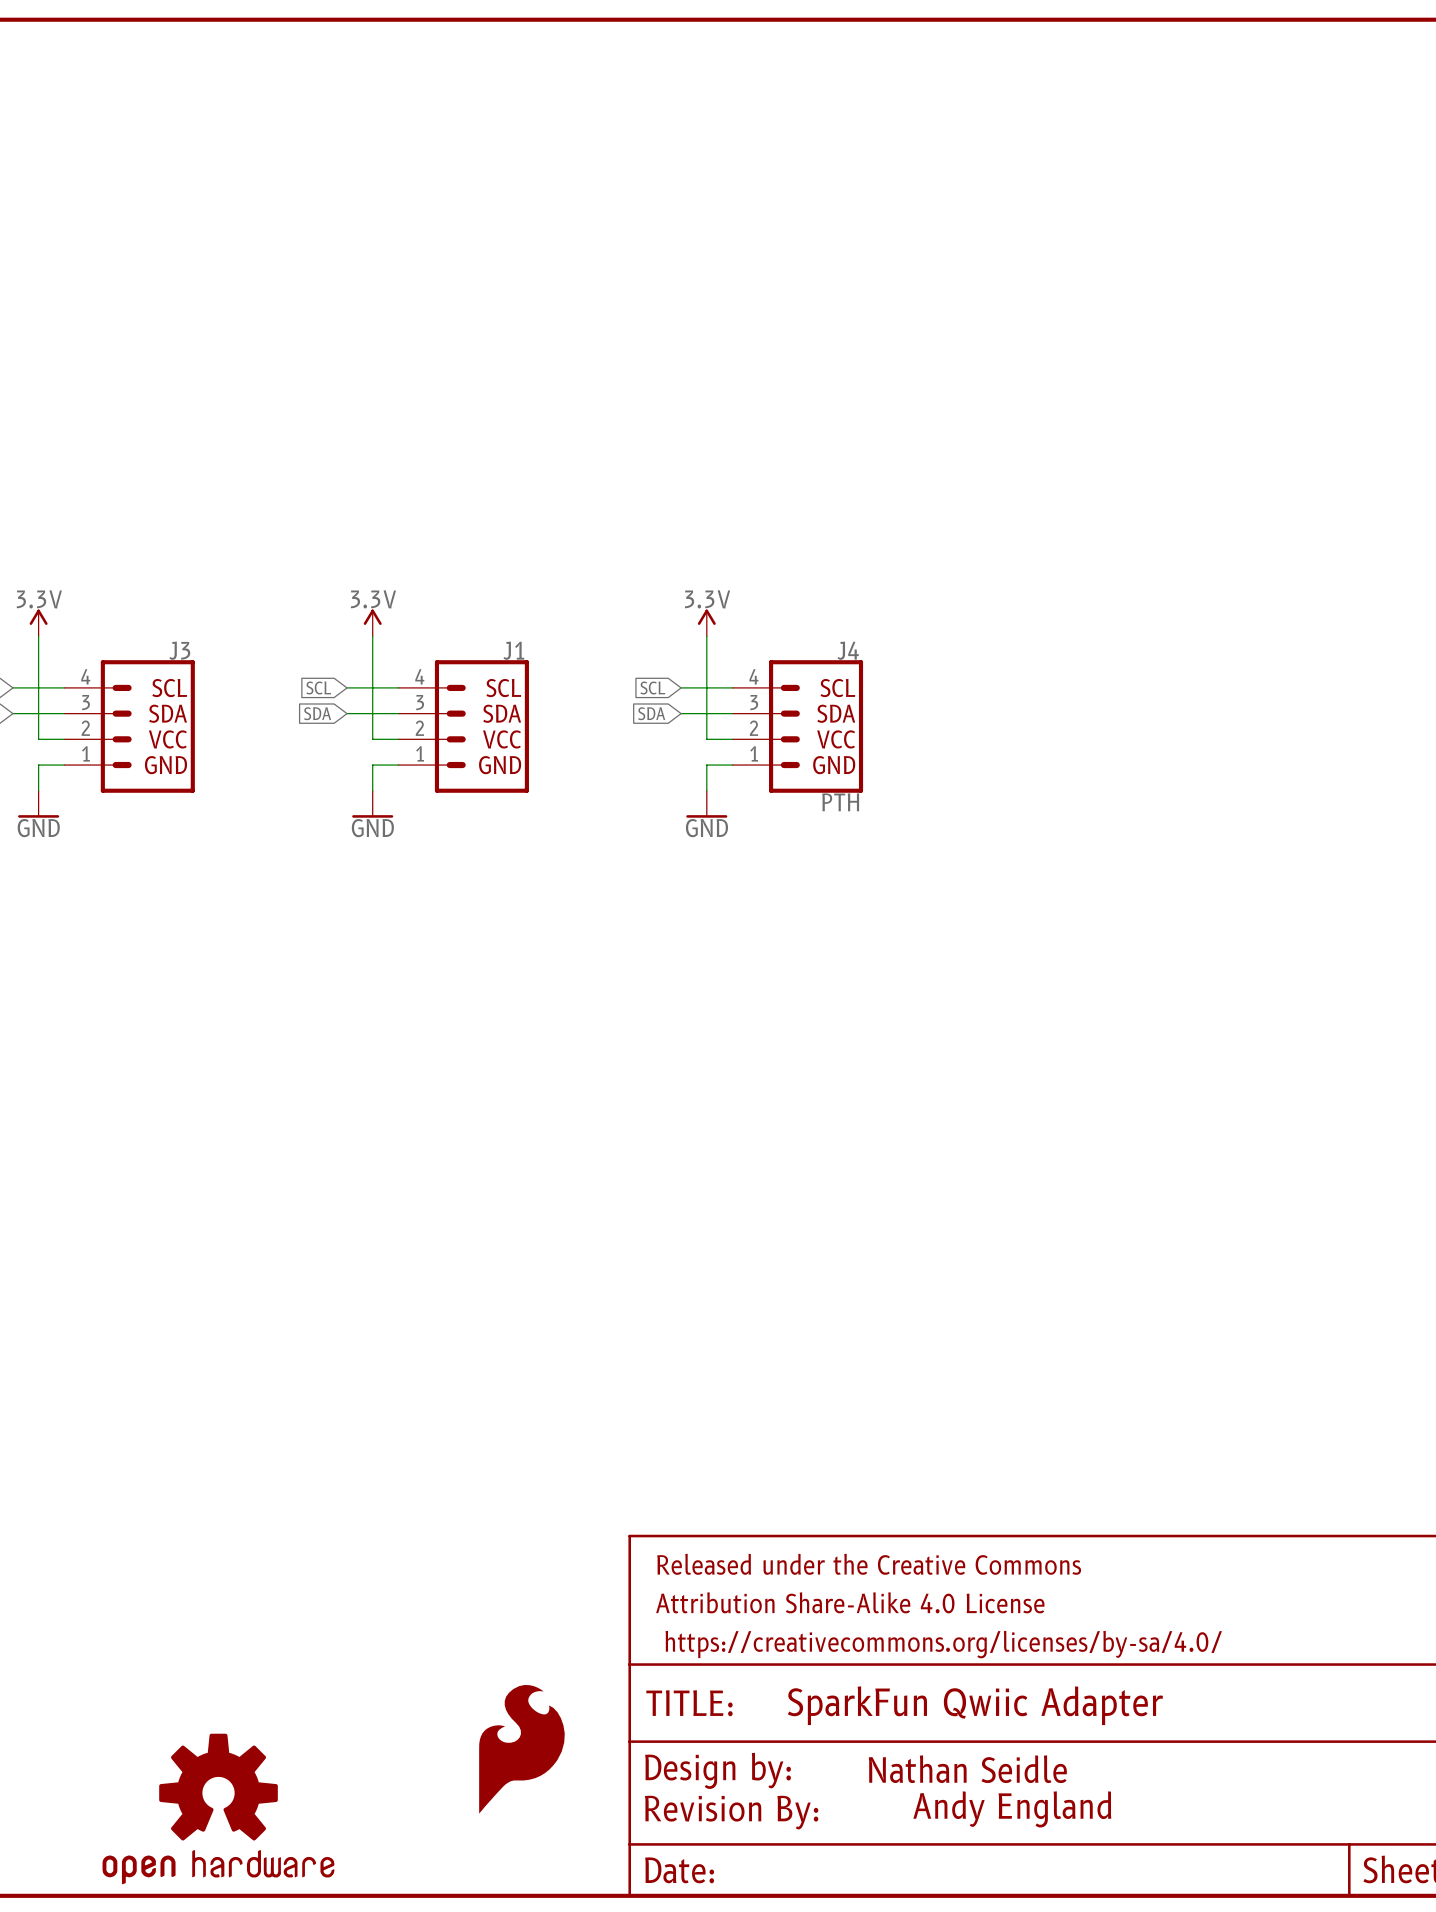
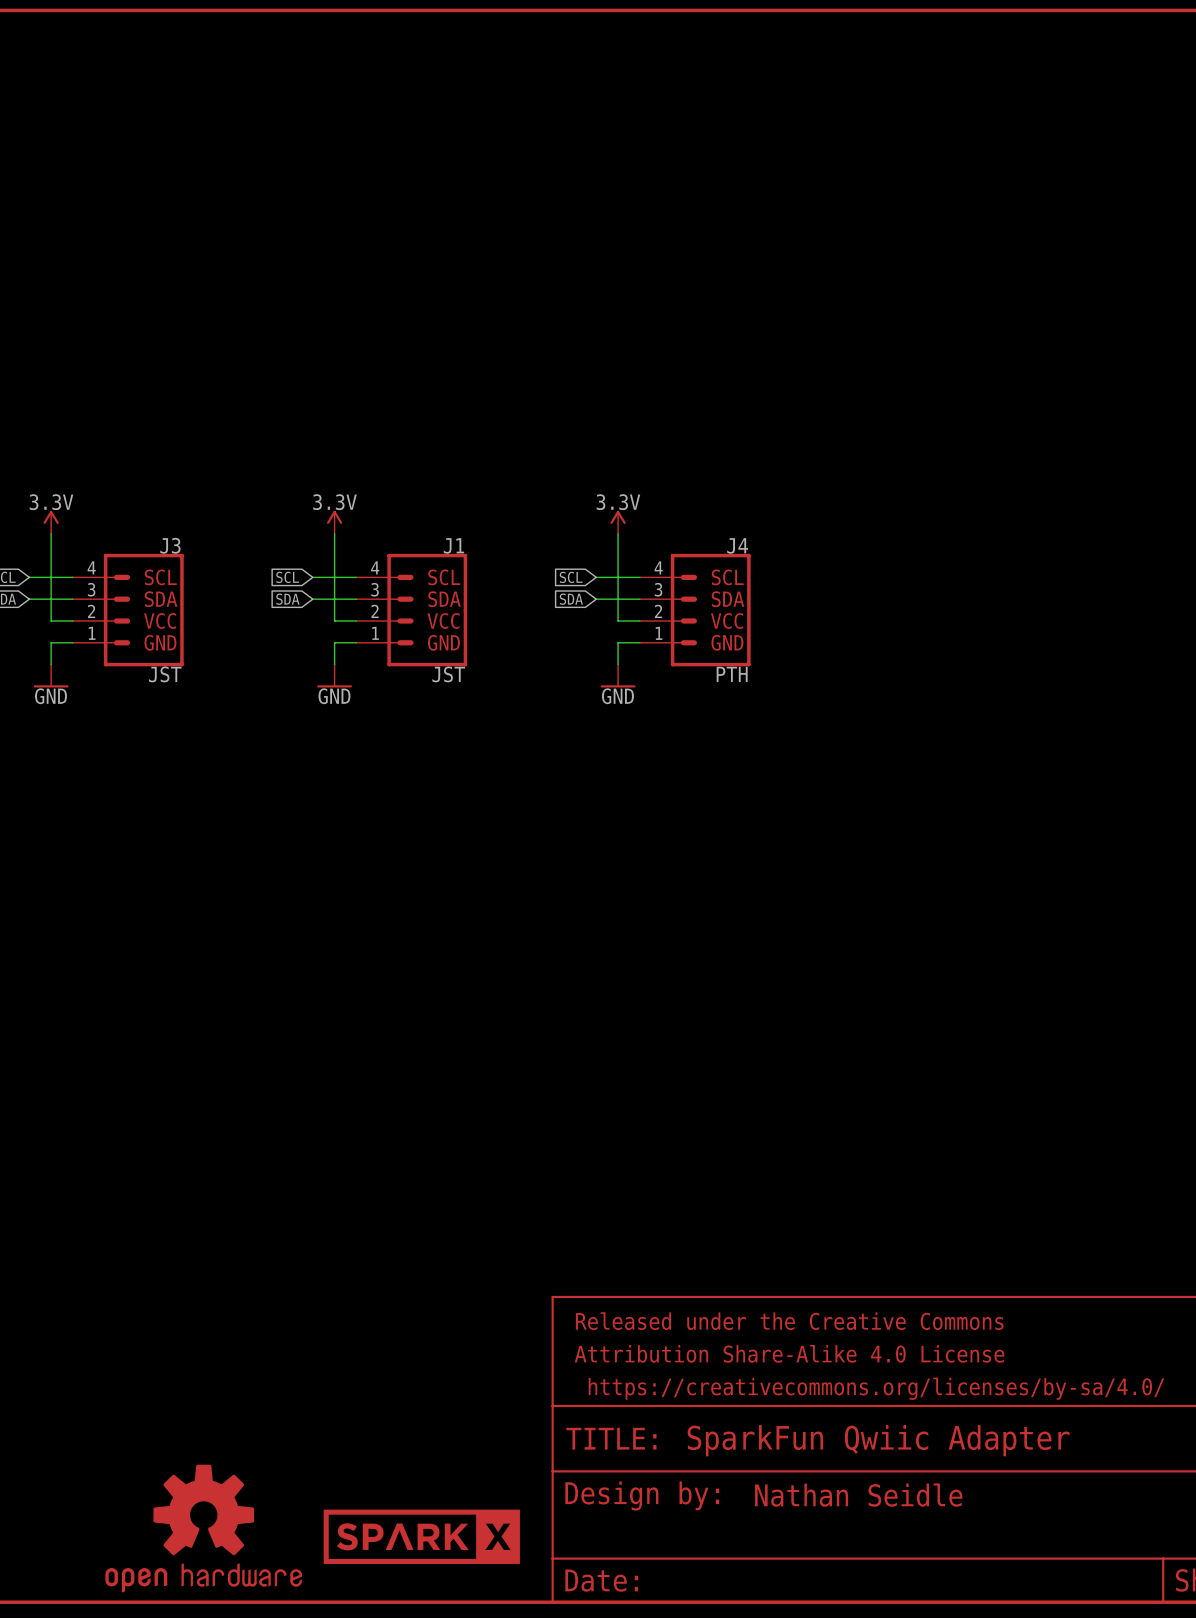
J3 value: none -> JST (165, 674)
J1 value: none -> JST (448, 674)
part: (521, 1749) -> none
text: Andy England (1012, 1809) -> none
part: (731, 1812) -> none
part: none -> (421, 1536)

